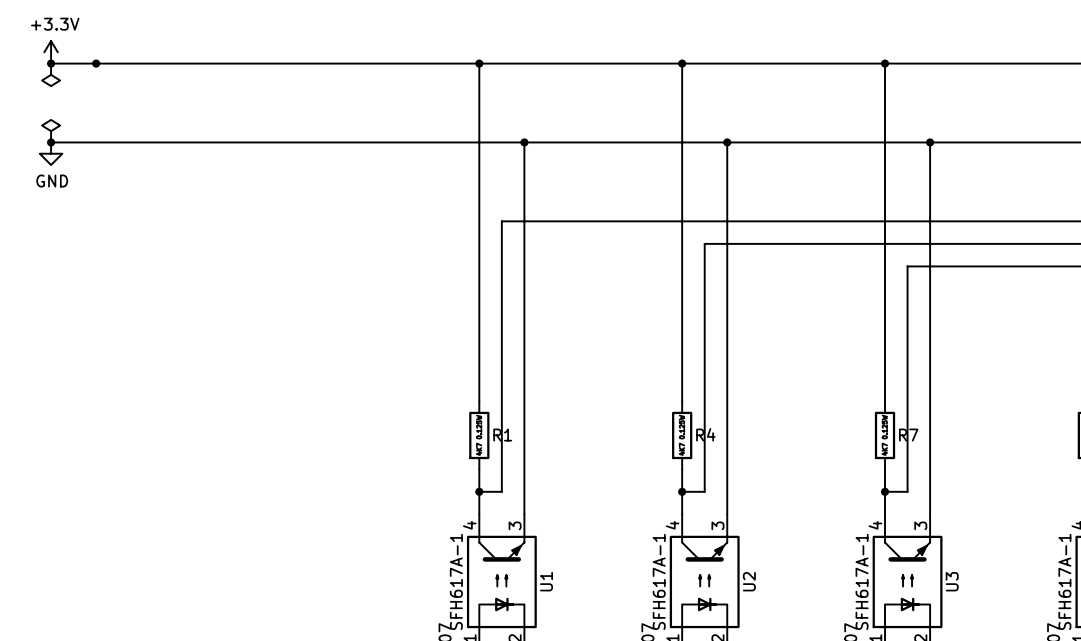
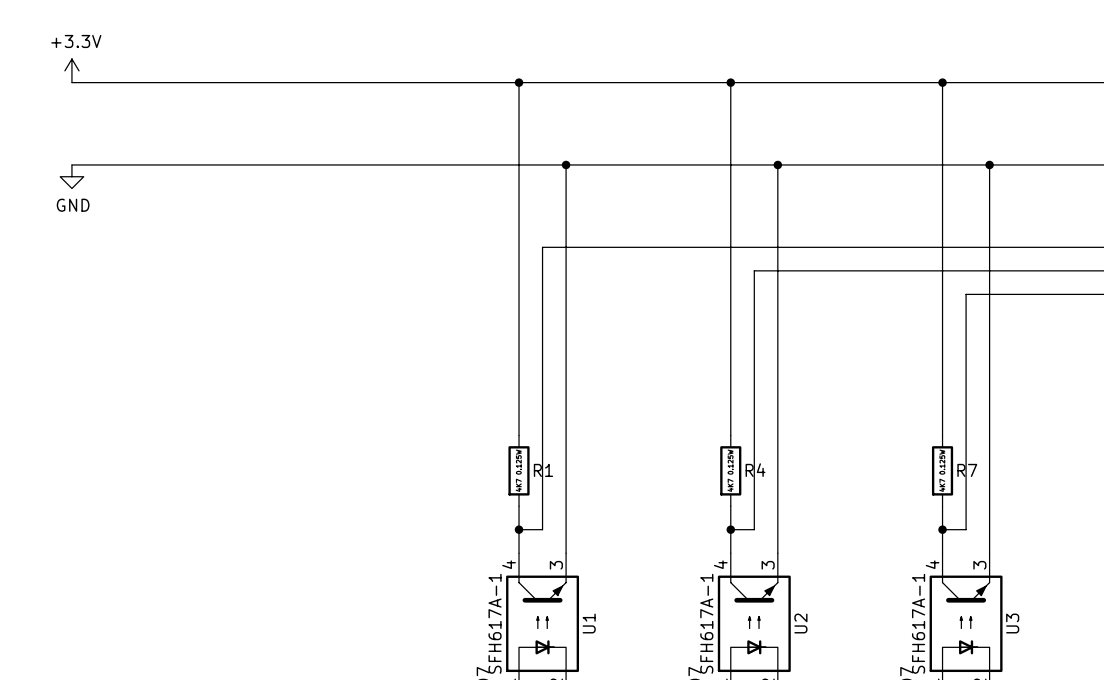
junction: (51, 63) -> none
junction: (96, 63) -> none
power symbol: (51, 74) -> none
power symbol: (51, 131) -> none
junction: (51, 142) -> none

